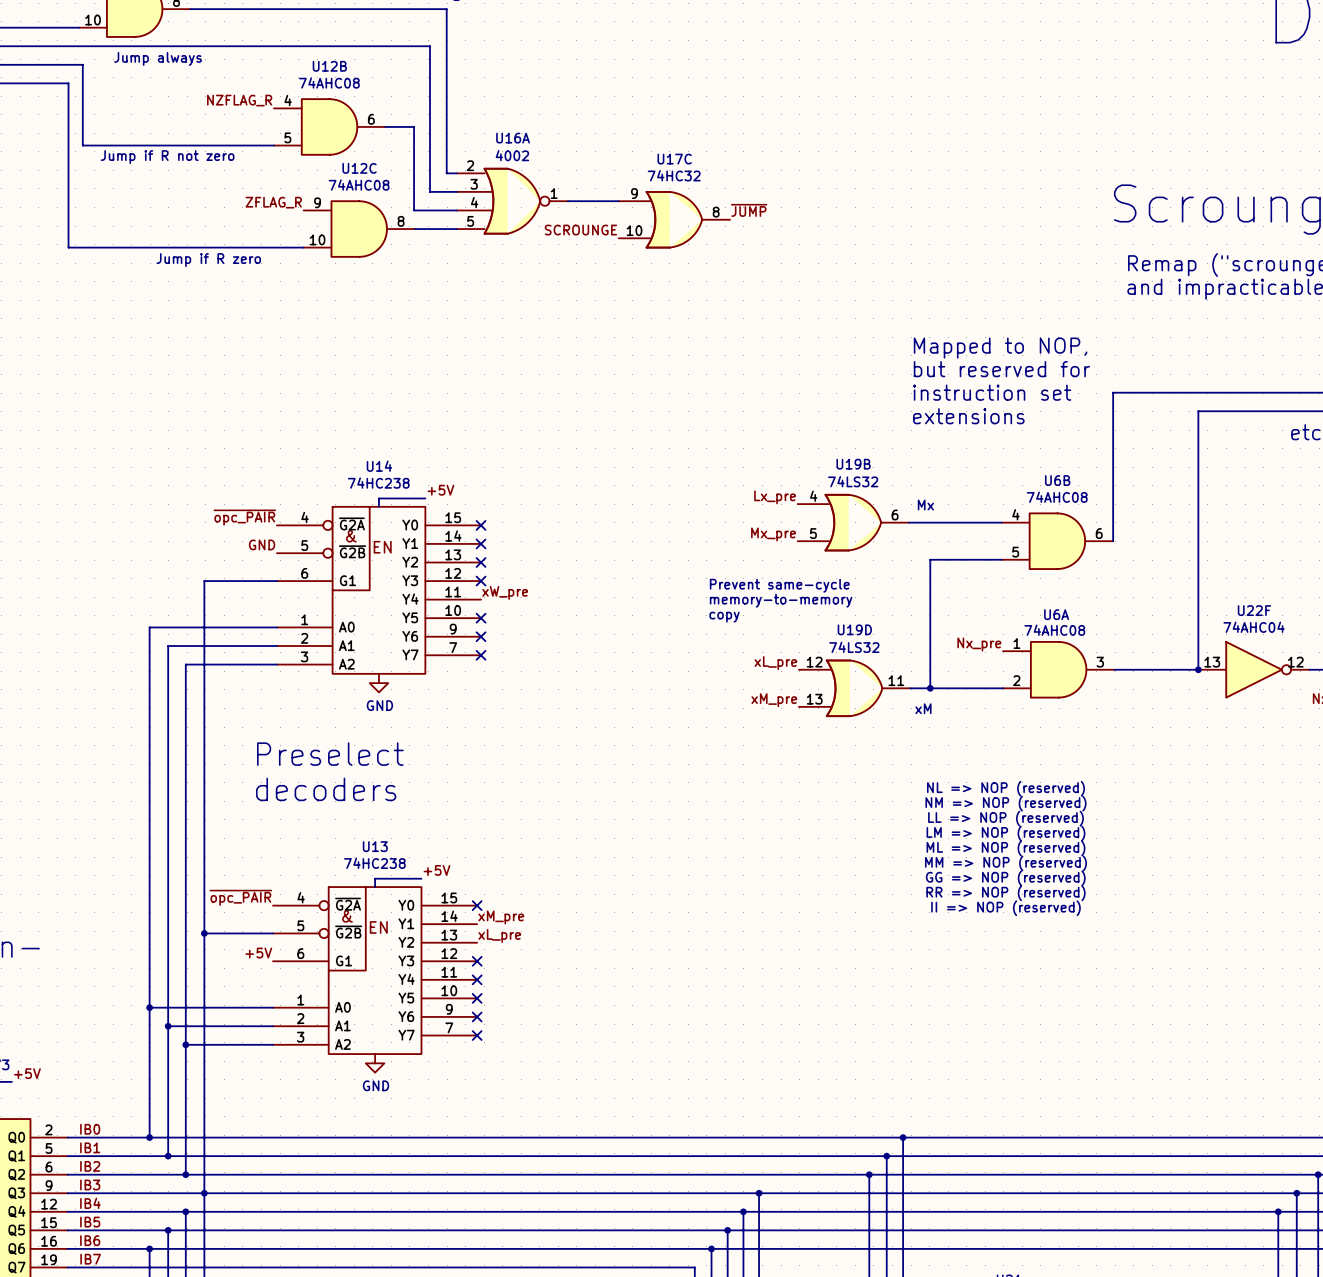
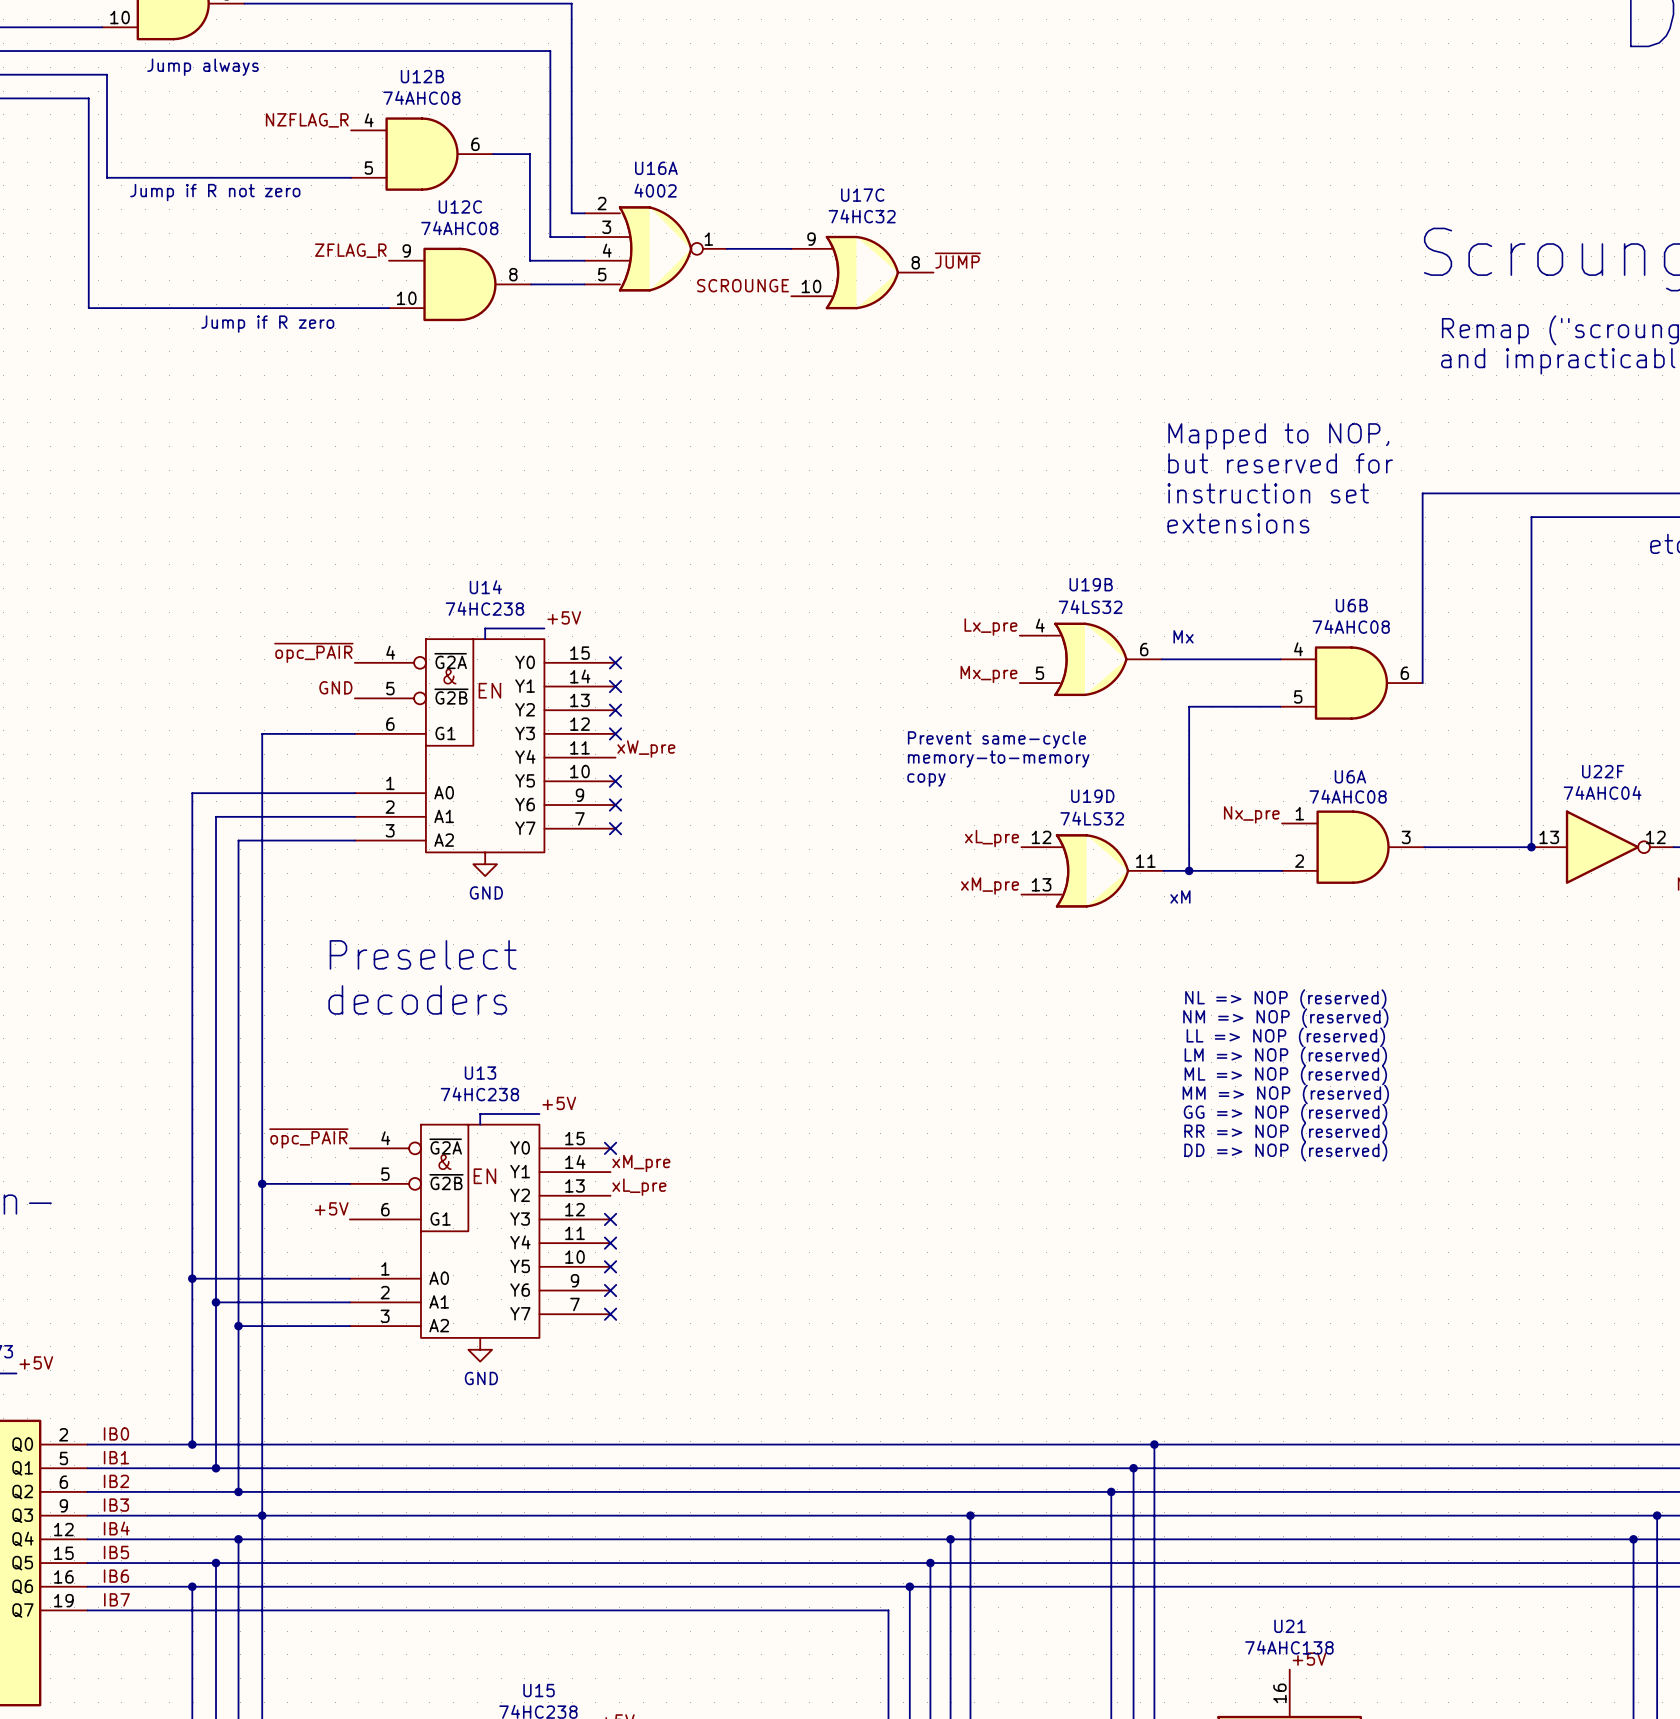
text: II => NOP (reserved) (1005, 908) -> DD => NOP (reserved) (1285, 1151)

